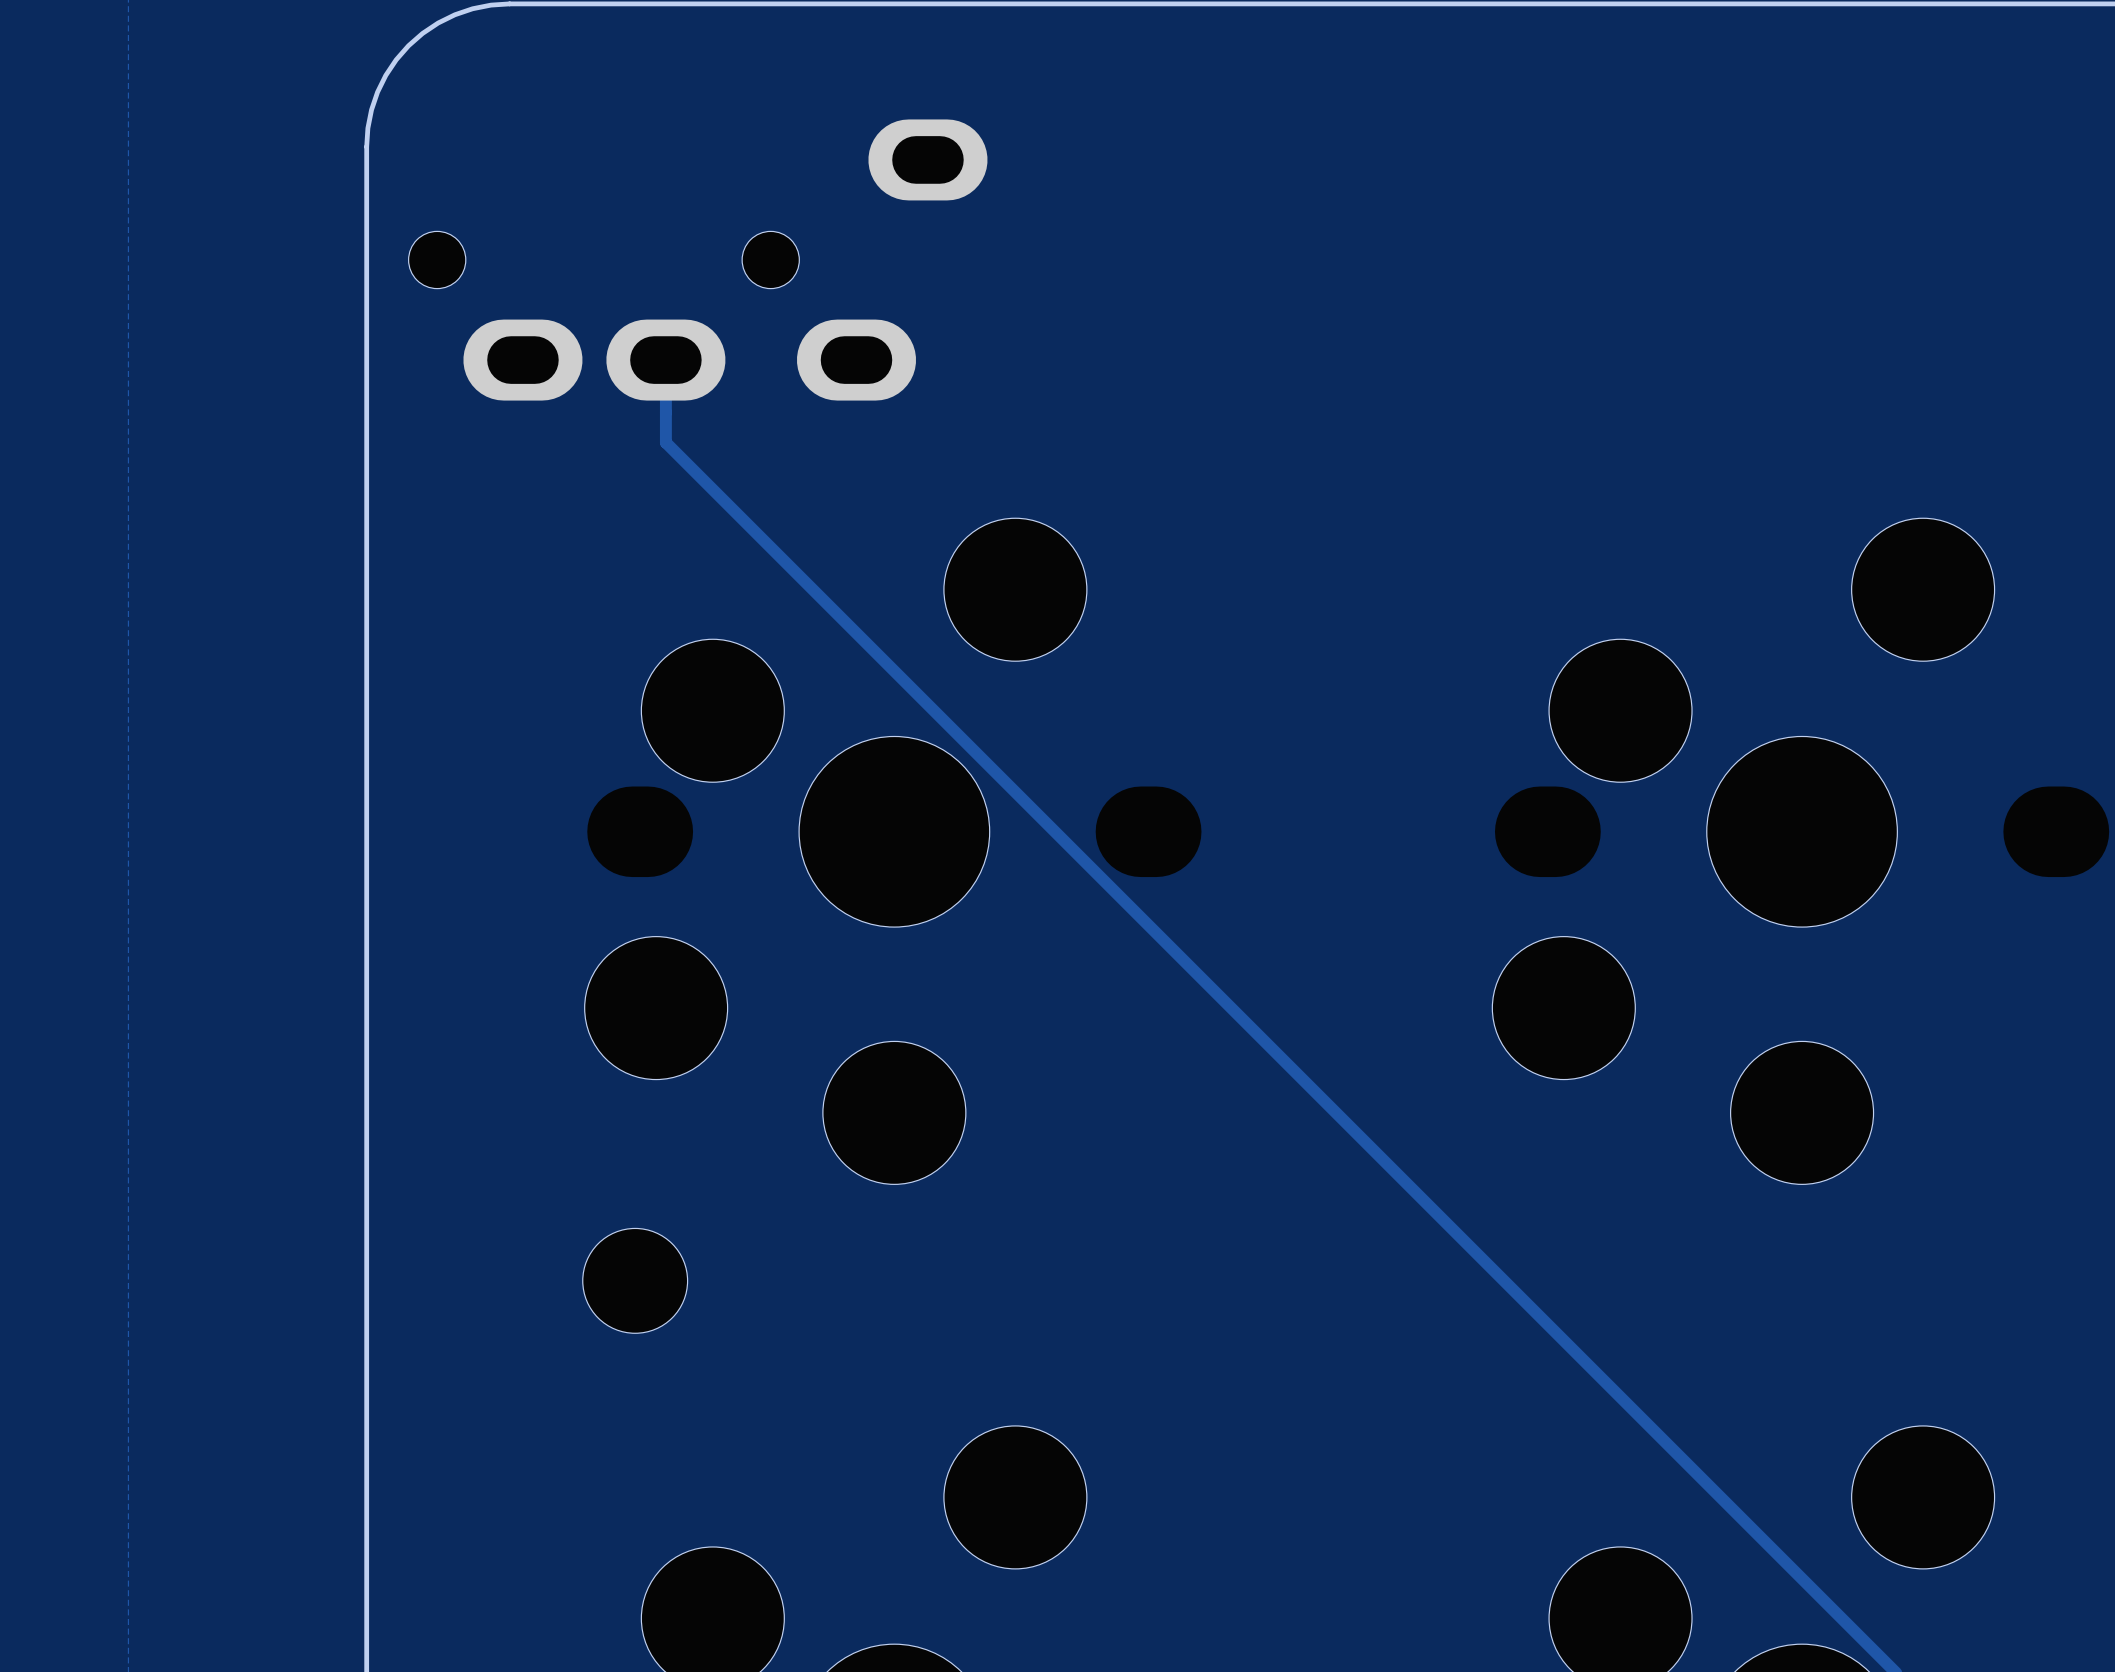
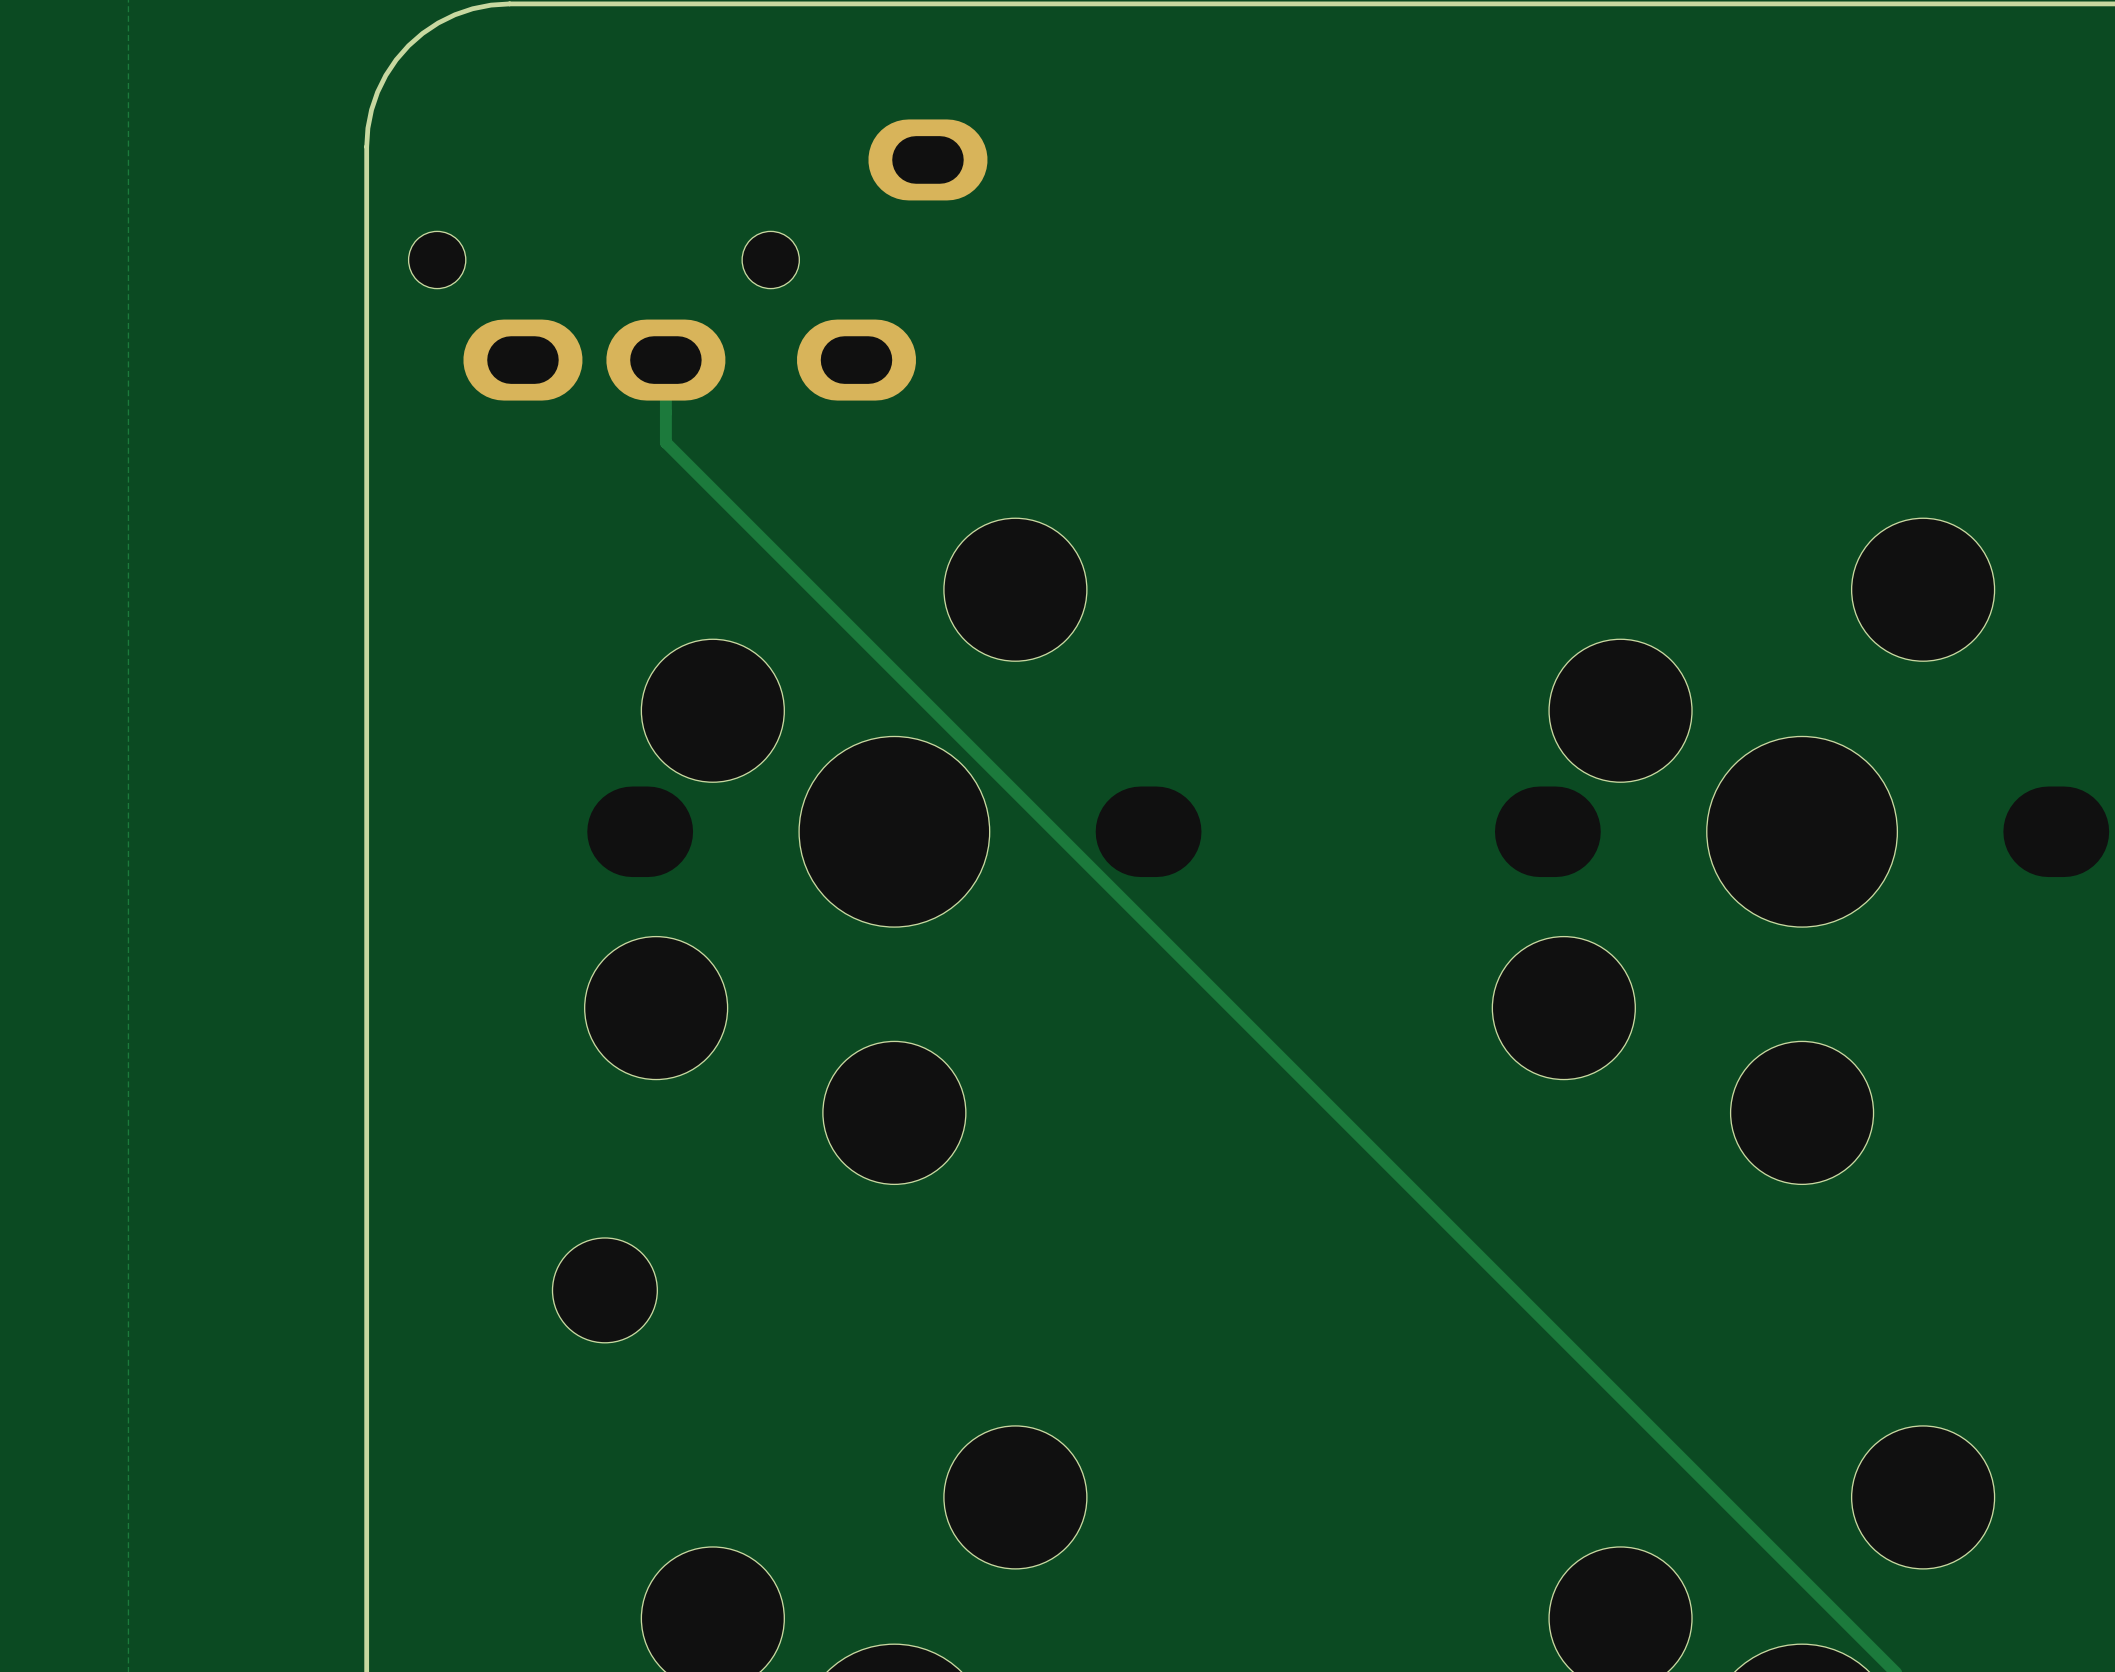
part position: (635, 1280) -> (604, 1290)

